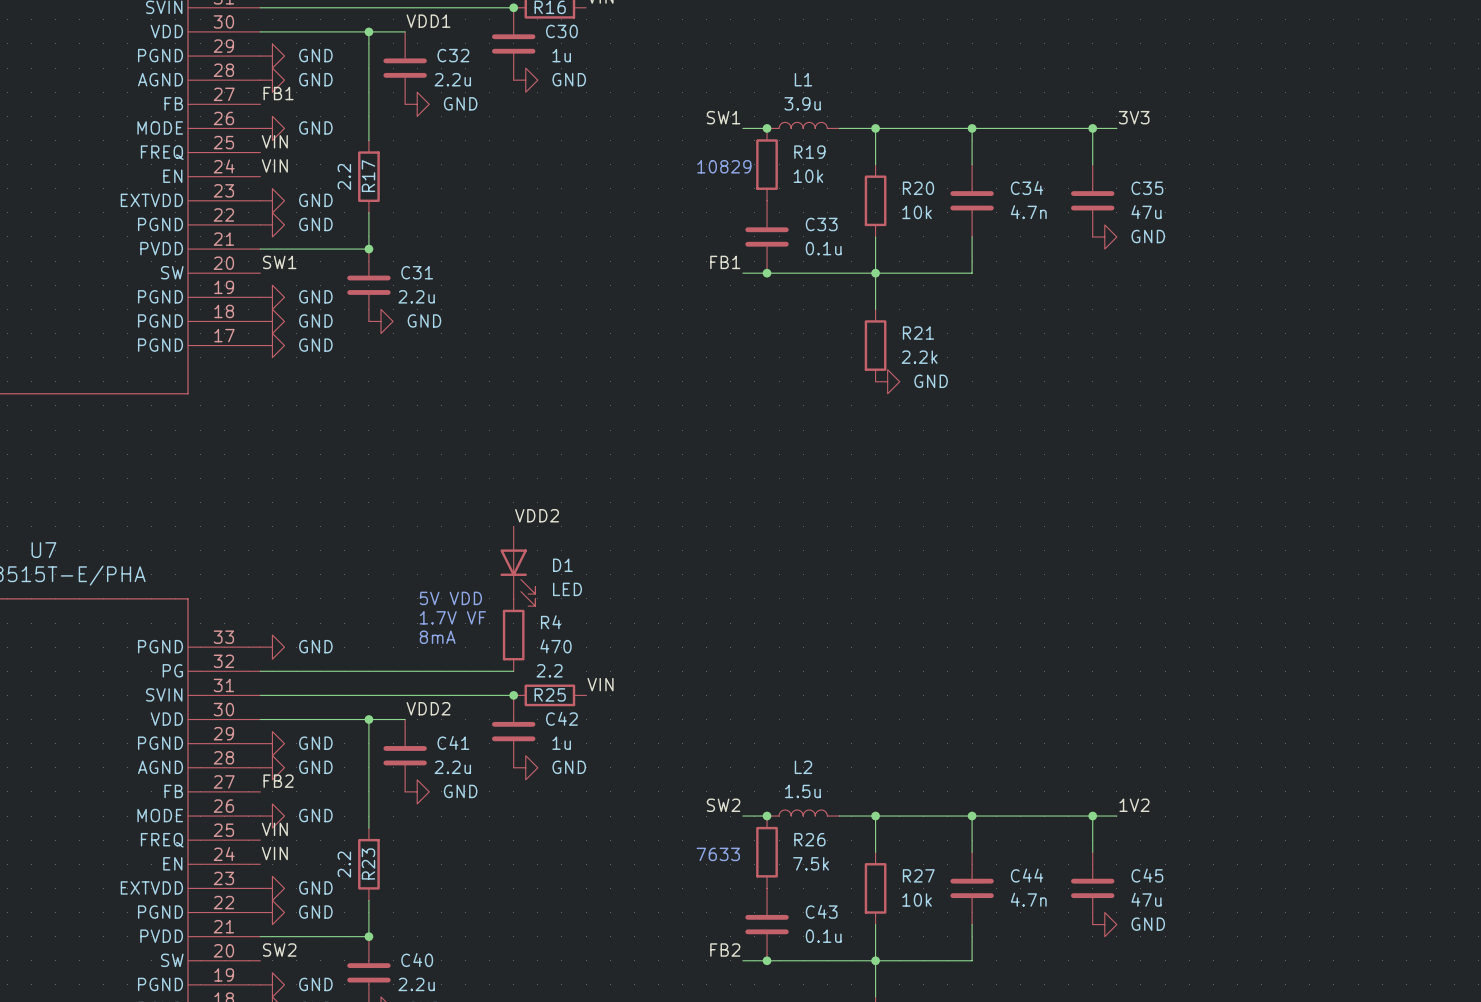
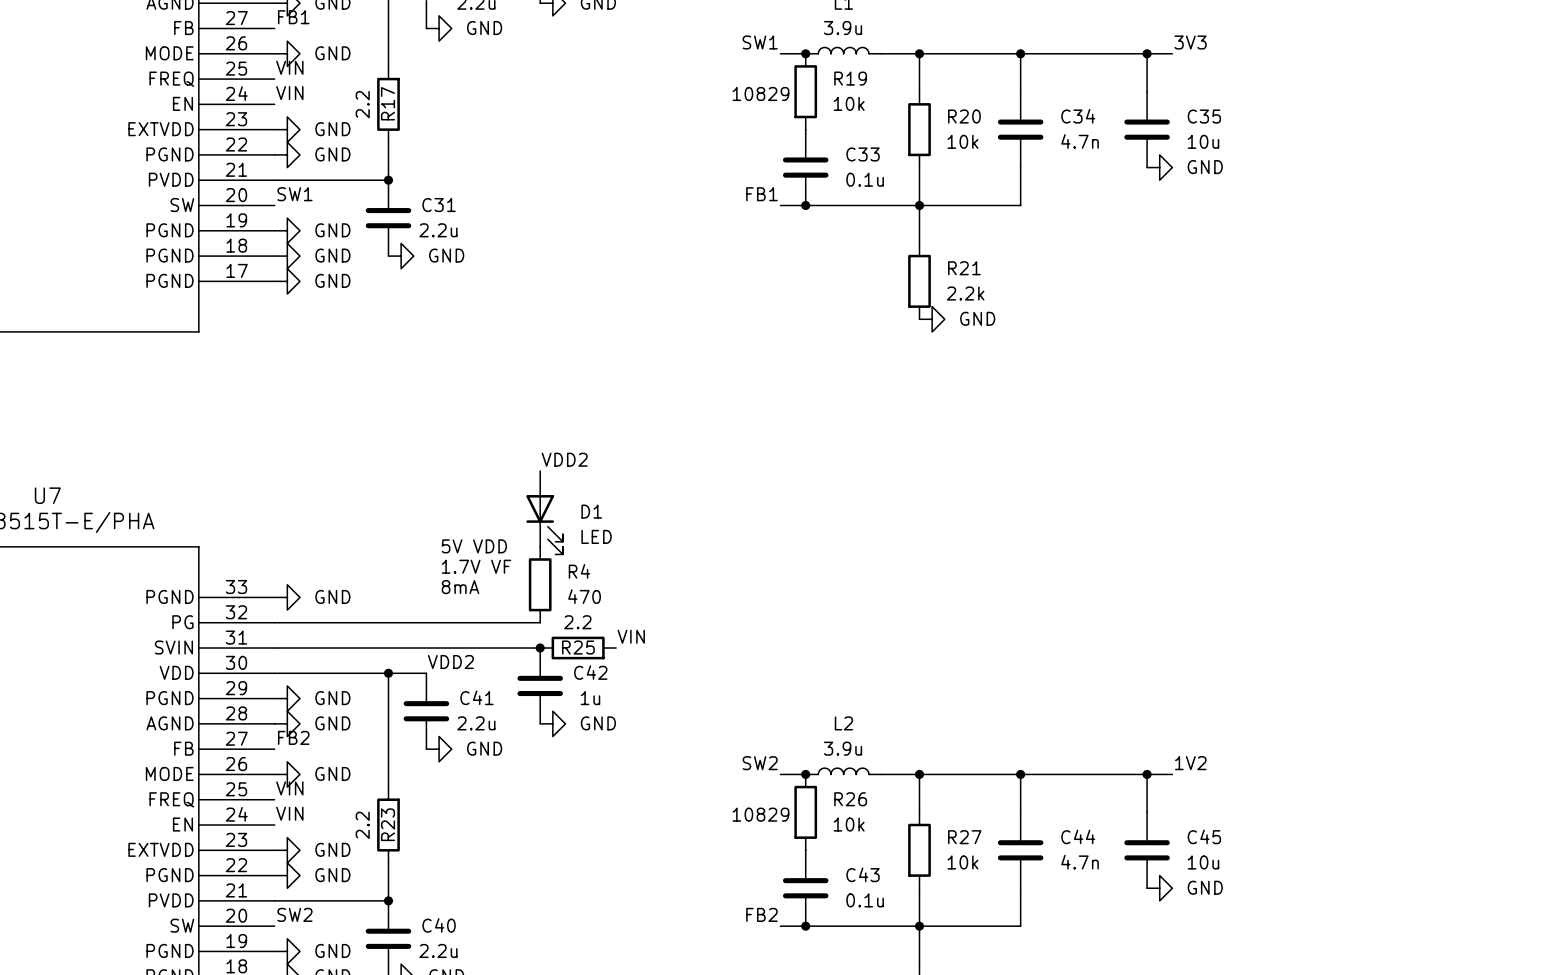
C35 value: 47u (1146, 212) -> 10u (1203, 141)
L2 value: 1.5u (802, 791) -> 3.9u (843, 748)
text: 7633 (718, 854) -> 10829 (760, 814)
R26 value: 7.5k (811, 863) -> 10k (849, 824)
C45 value: 47u (1146, 899) -> 10u (1203, 862)

